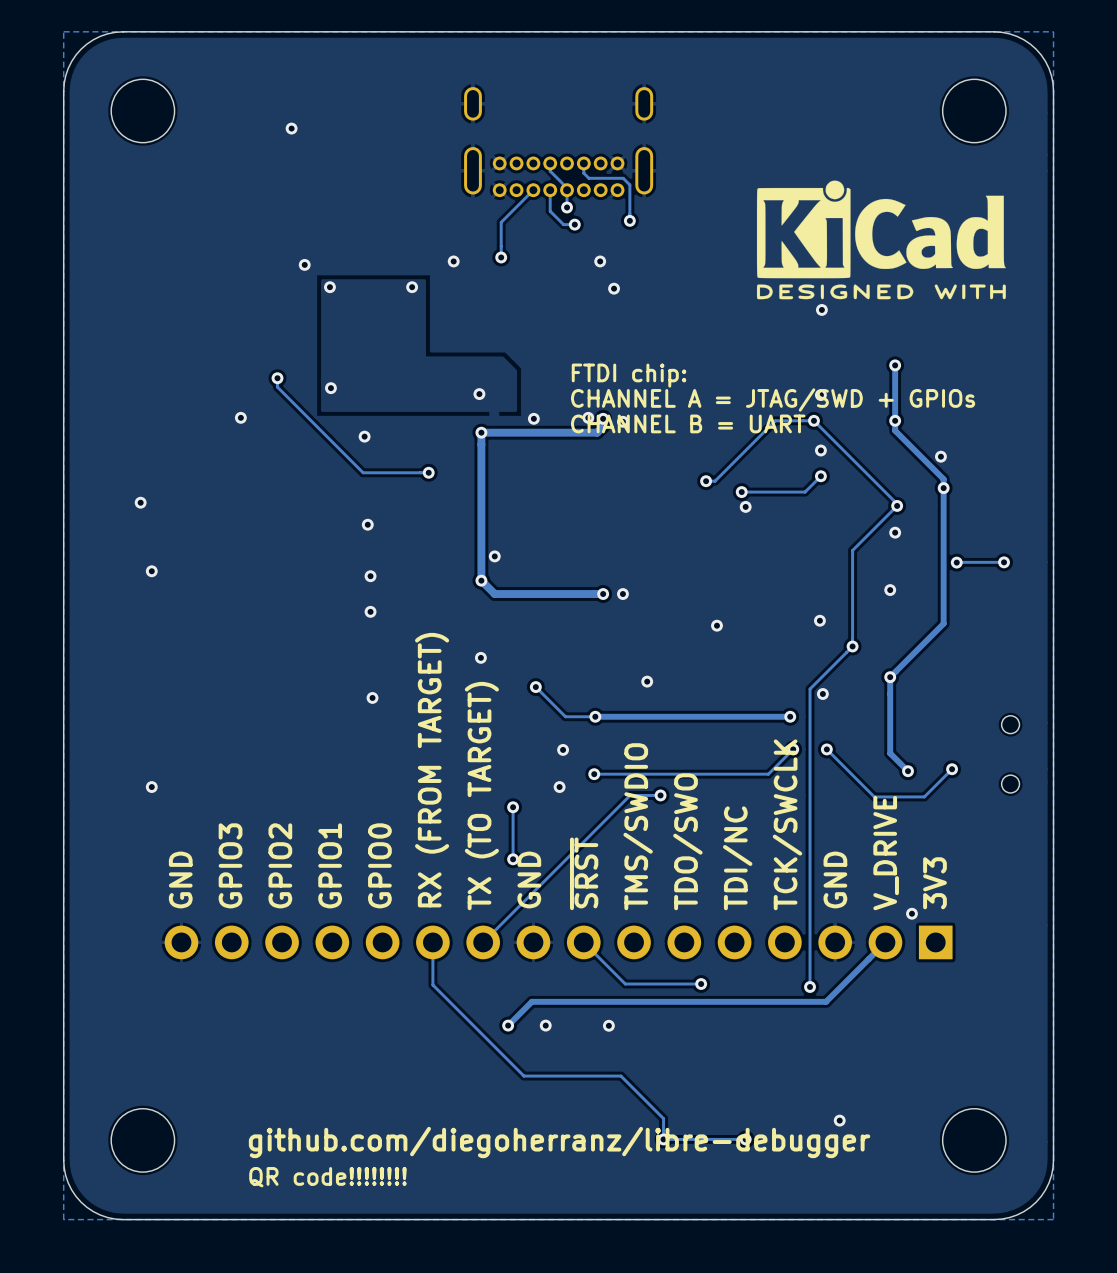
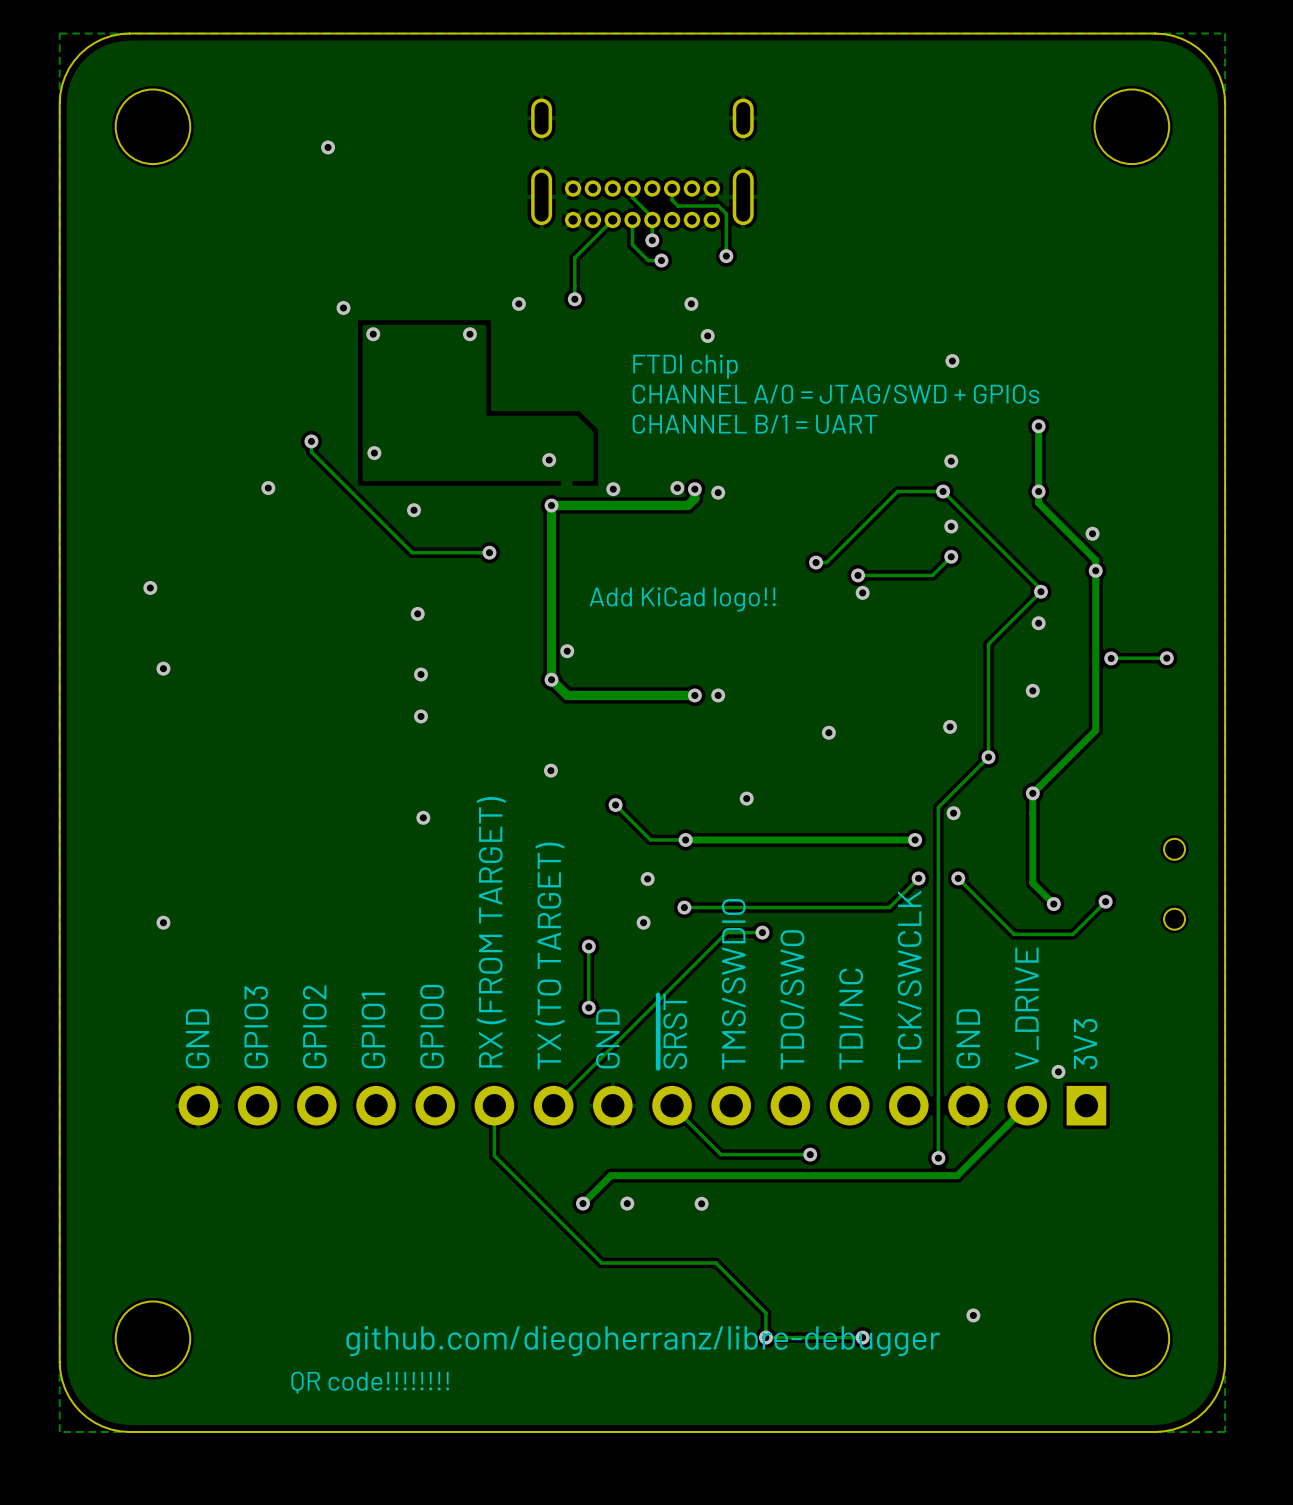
drawing: [756, 180, 1006, 300] -> none
text: none -> FTDI chip (685, 366)
text: none -> CHANNEL A/0 = JTAG/SWD + GPIOs (835, 394)
text: none -> CHANNEL B/1 = UART (755, 424)
text: FTDI chip: (629, 375) -> none
text: CHANNEL A = JTAG/SWD + GPIOs (773, 399) -> none
text: CHANNEL B = UART (688, 423) -> none
text: none -> Add KiCad logo!! (682, 599)

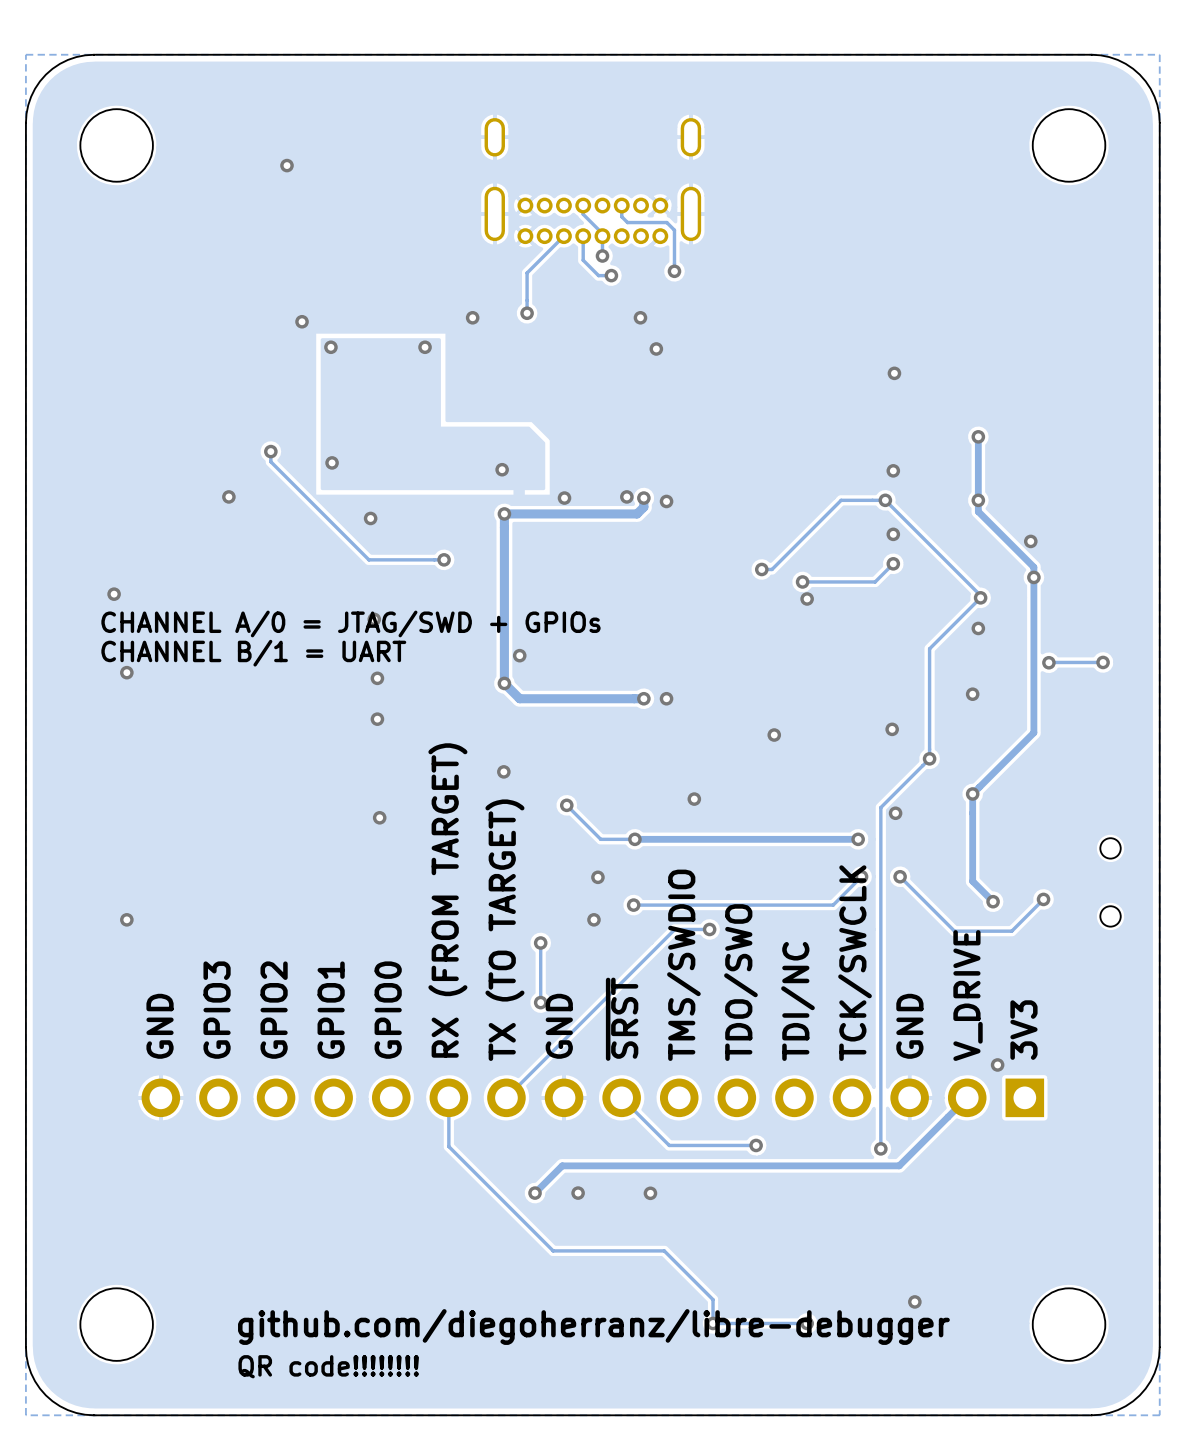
text: FTDI chip (685, 366) -> none
text position: CHANNEL A/0 = JTAG/SWD + GPIOs (835, 394) -> CHANNEL A/0 = JTAG/SWD + GPIOs (350, 623)
text position: CHANNEL B/1 = UART (755, 424) -> CHANNEL B/1 = UART (253, 653)
text: Add KiCad logo!! (682, 599) -> none

